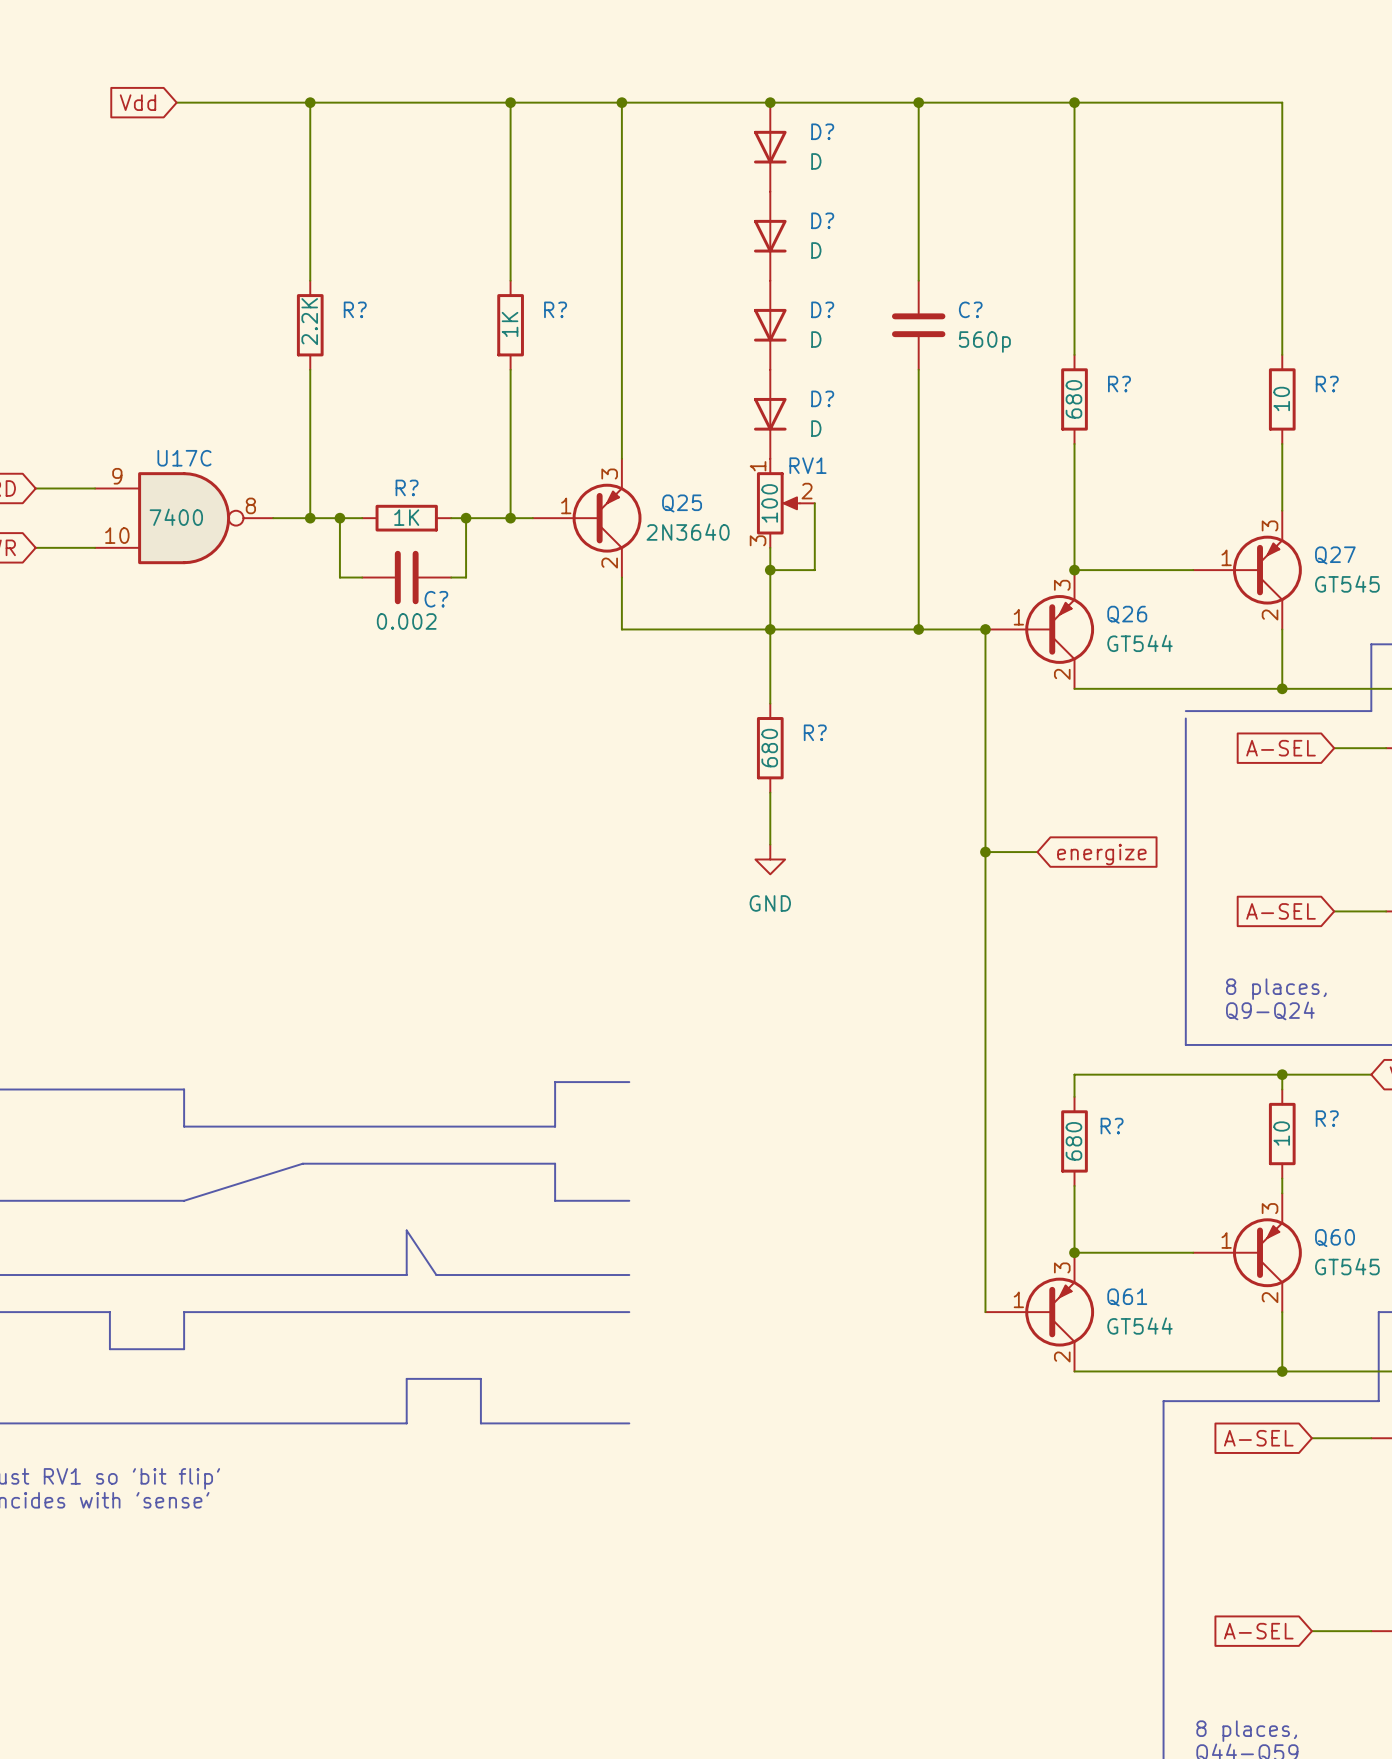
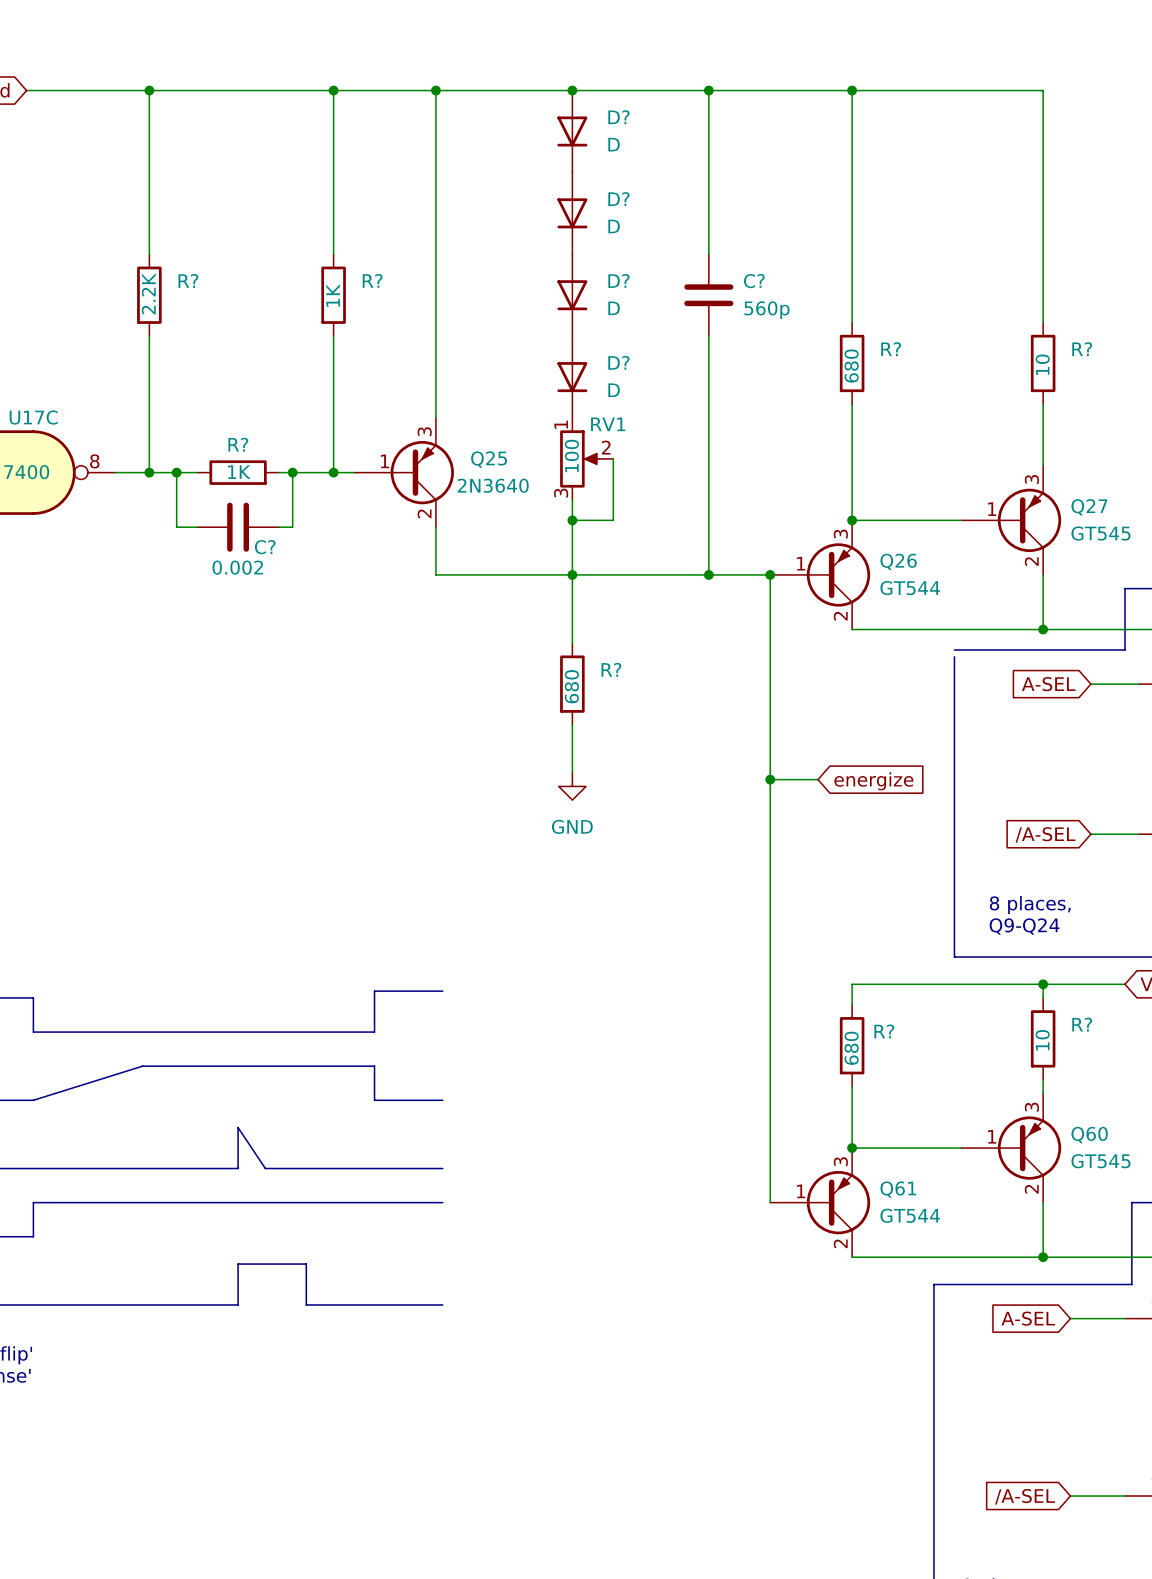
global label: A-SEL (1281, 911) -> /A-SEL (1045, 834)
global label: A-SEL (1258, 1631) -> /A-SEL (1025, 1496)

